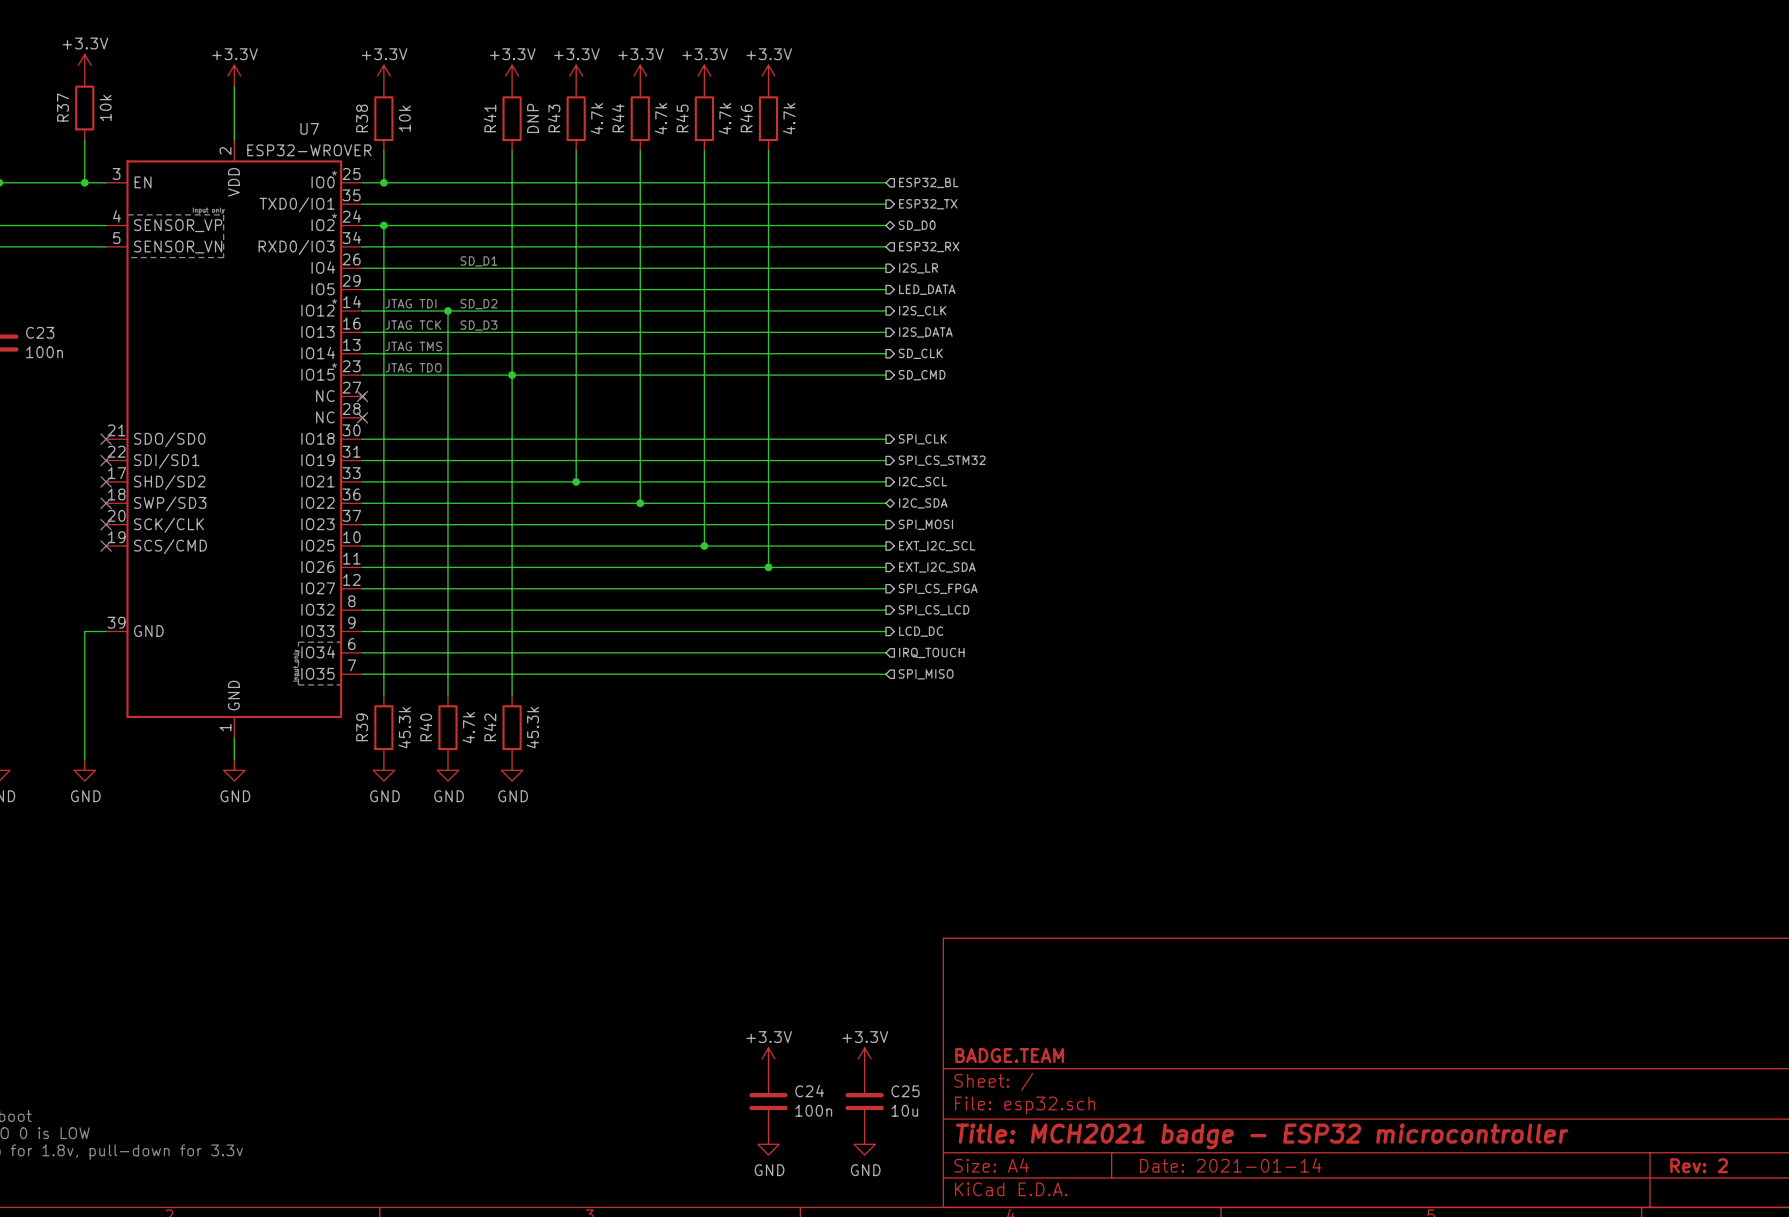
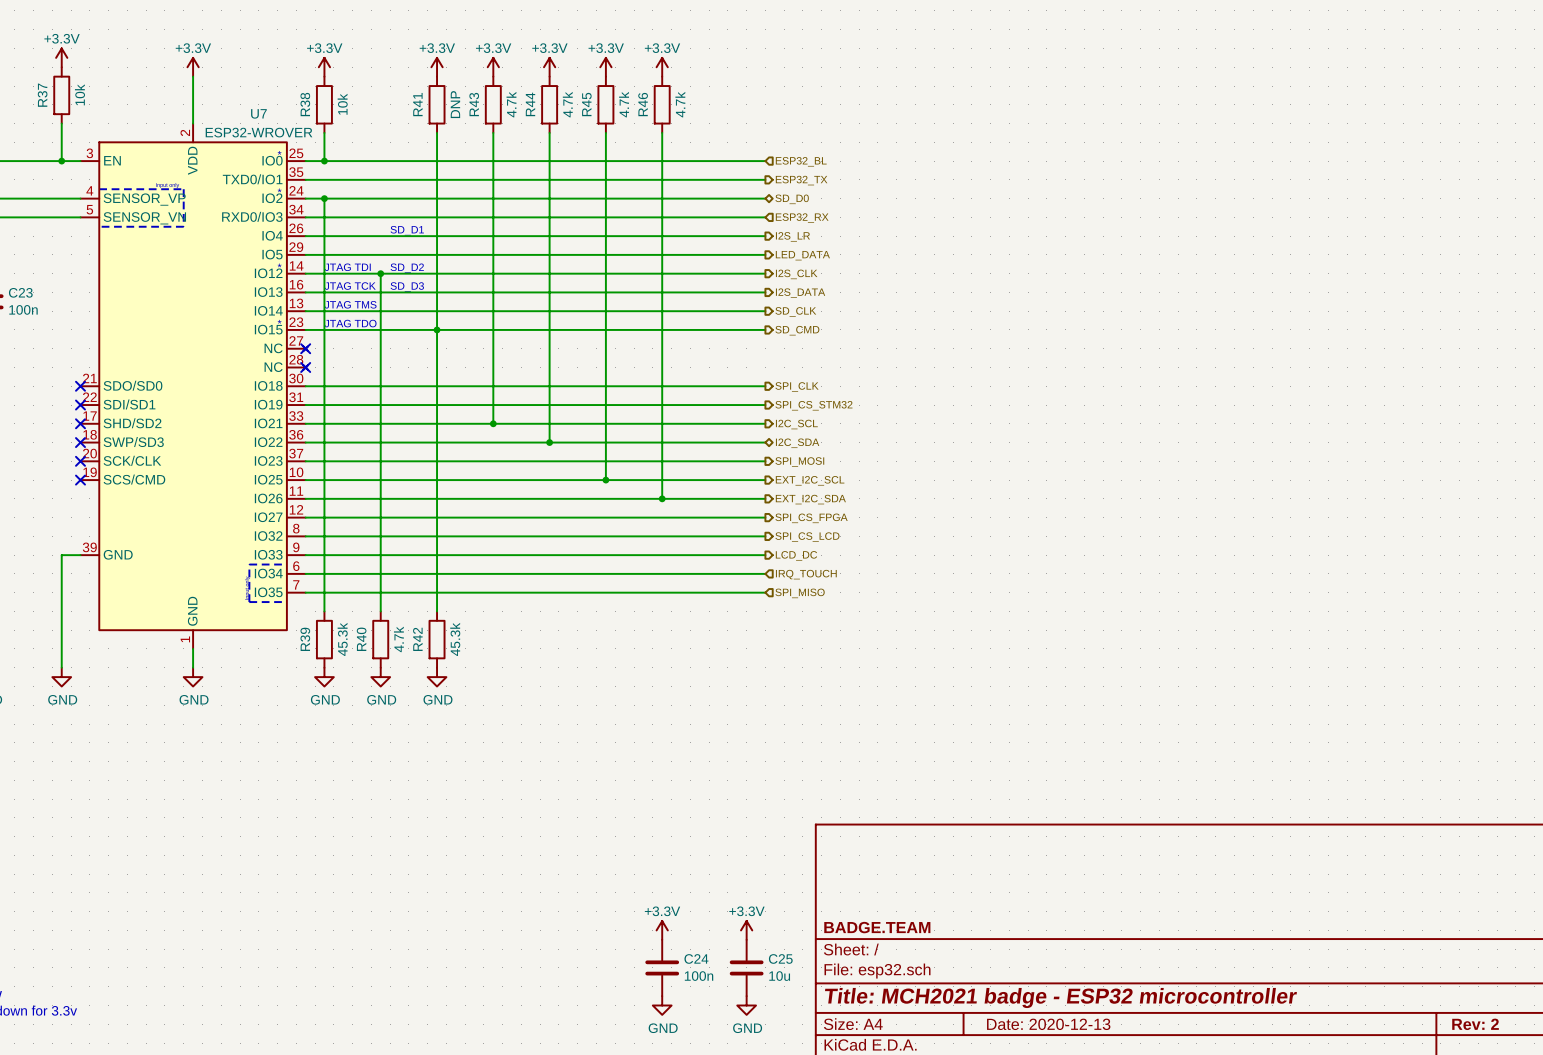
title block: Date: 2021-01-14 (1230, 1165) -> Date: 2020-12-13 (1048, 1024)

